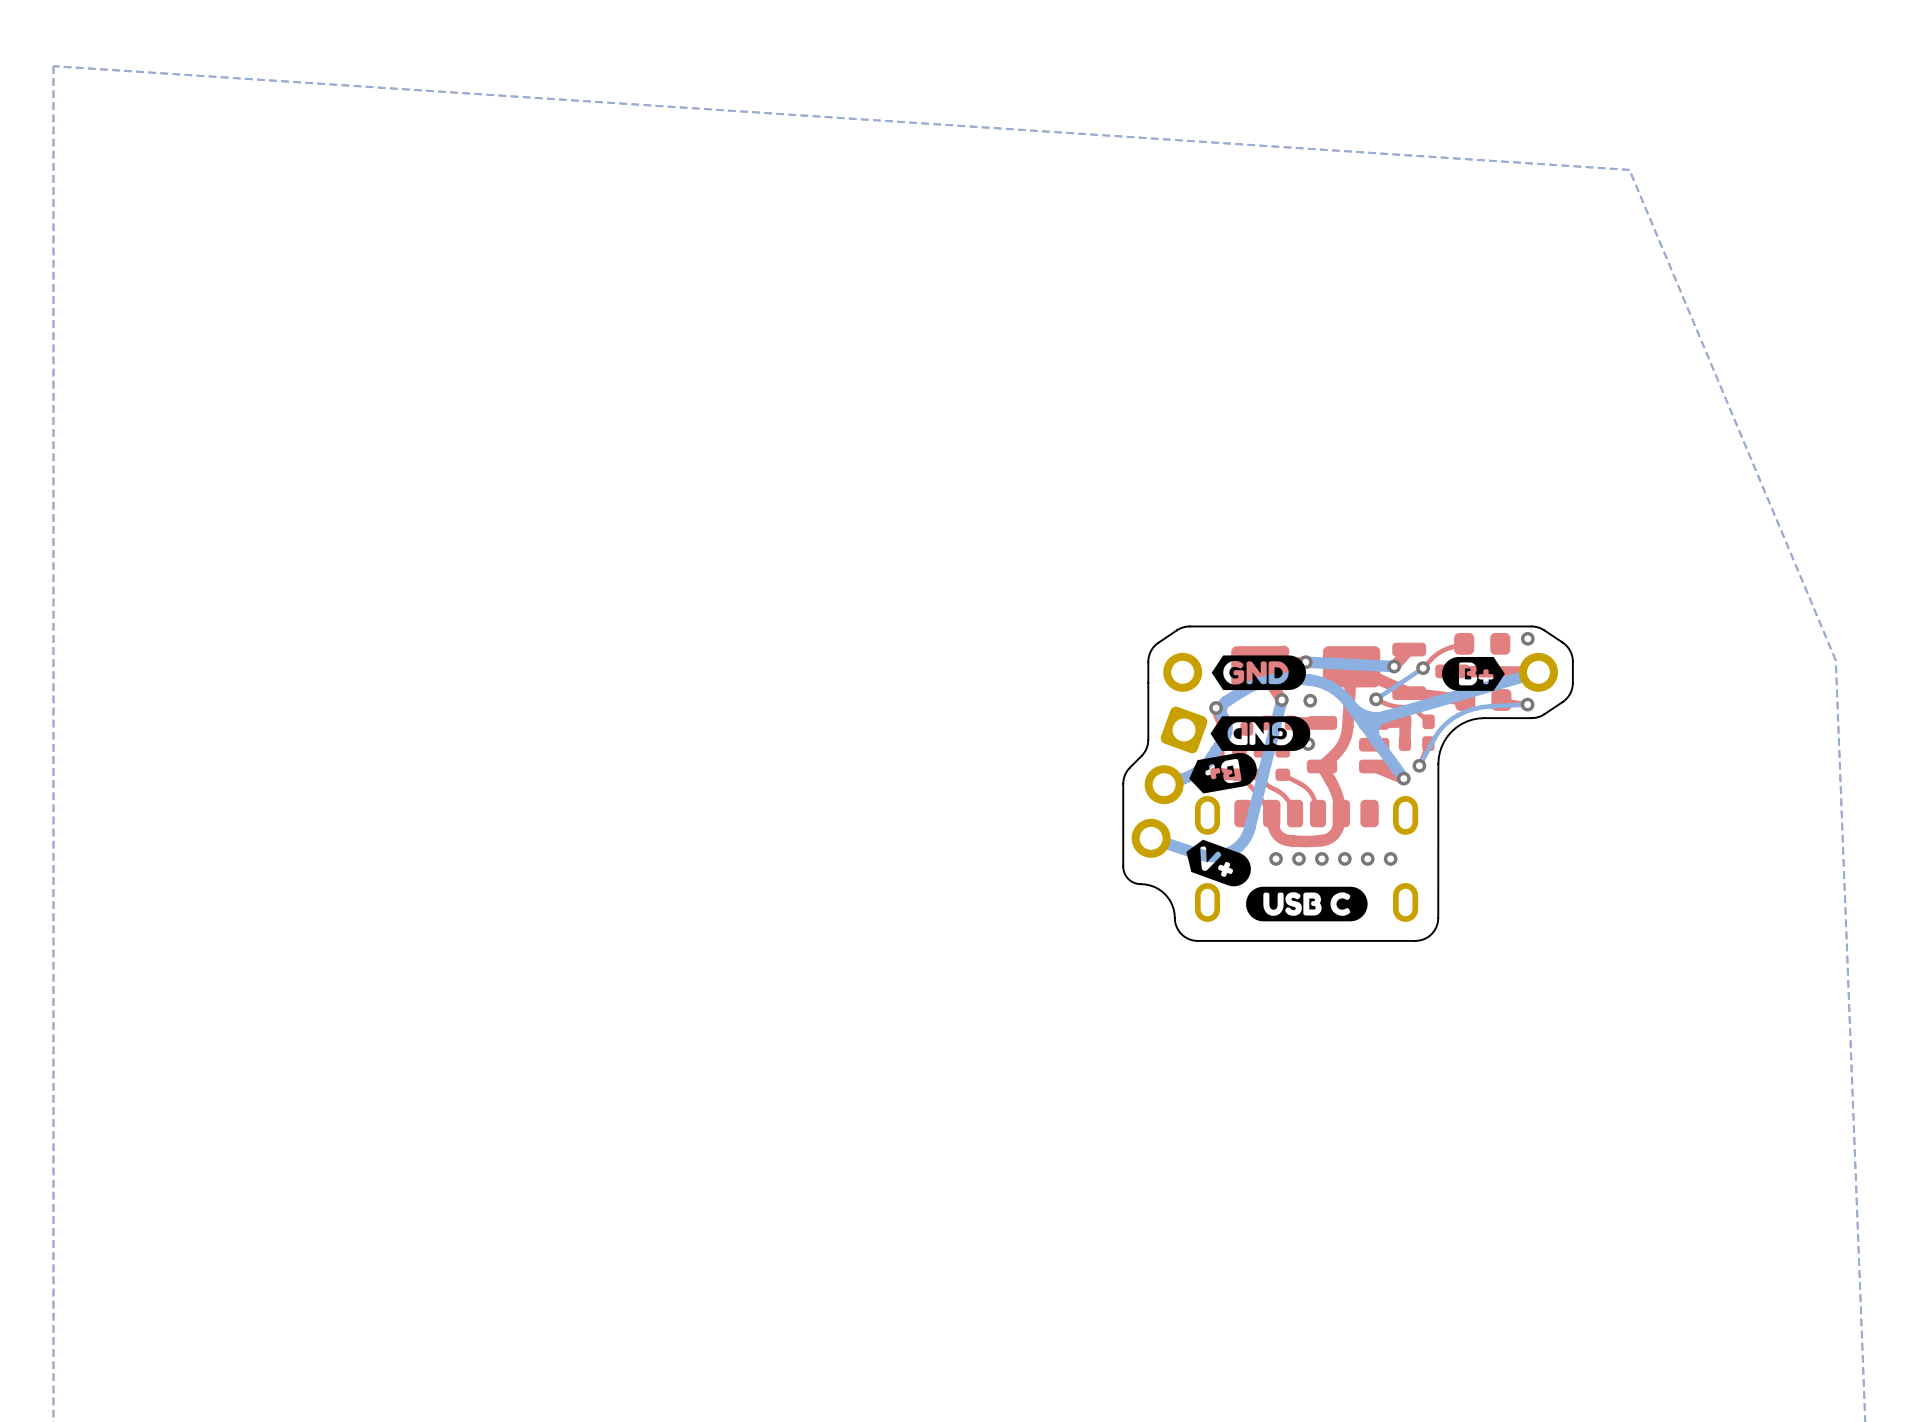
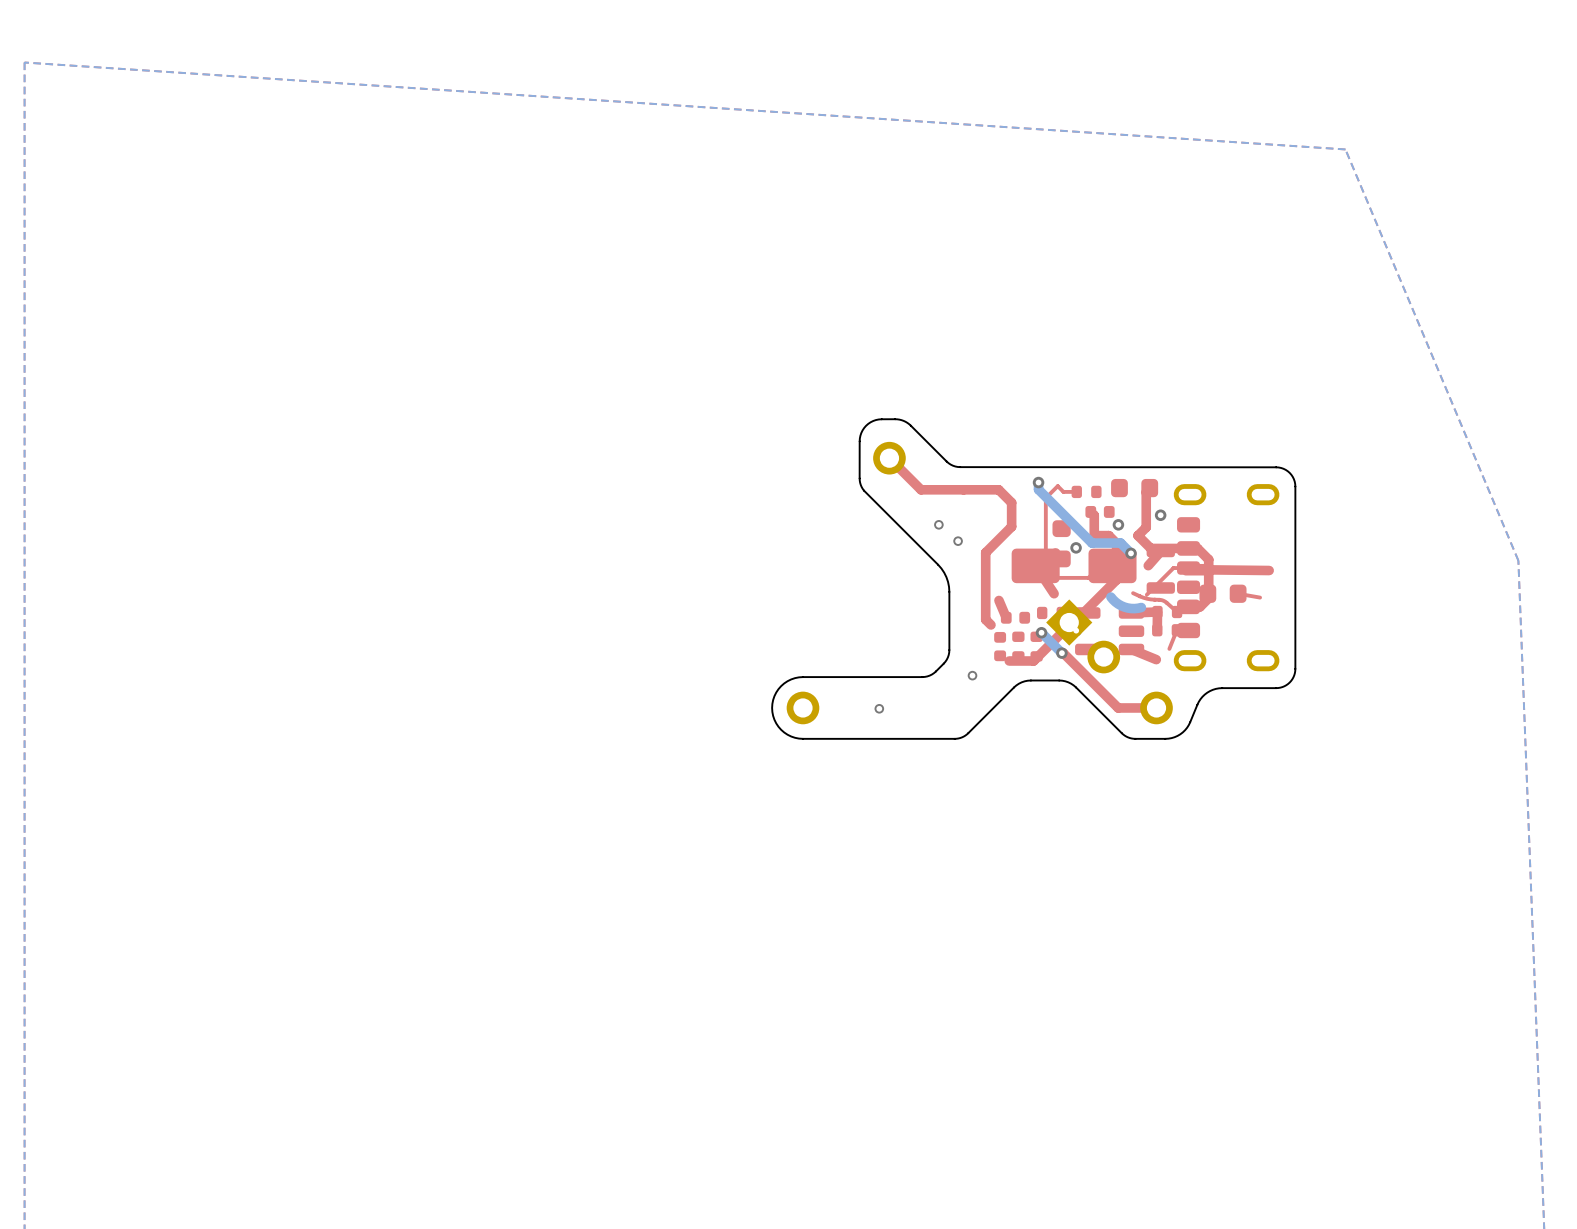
board edge: none -> (895, 419) (876, 420) (868, 423) (862, 430) (859, 441) (860, 482) (863, 490) (944, 572) (949, 591) (947, 657) (934, 673) (924, 676) (802, 677) (791, 679) (784, 683) (776, 692) (772, 707) (776, 723) (787, 734) (802, 738) (958, 738) (966, 734) (1018, 683) (1027, 680) (1059, 680) (1073, 685) (1126, 736) (1133, 738) (1168, 738) (1177, 735) (1185, 730) (1198, 701) (1210, 691) (1222, 688) (1278, 688) (1286, 685) (1292, 679) (1295, 668) (1295, 486) (1292, 476) (1285, 469) (1276, 467) (957, 466) (946, 461) (909, 424) (895, 419)
top track: none -> (889, 458) (921, 489) (998, 489) (1011, 502) (1011, 526) (985, 552) (985, 619) (990, 624)
part: none -> (889, 458)
bottom track: none -> (1038, 482) (1038, 489) (1091, 543) (1120, 543) (1131, 553)
via: none -> (1038, 482)
part: none -> (1134, 488)
top track: none -> (1149, 488) (1146, 492) (1146, 527) (1137, 535) (1150, 548) (1197, 548) (1208, 559) (1208, 598) (1200, 606) (1188, 606)
top track: none -> (1076, 491) (1063, 491) (1057, 486) (1045, 498) (1045, 568) (1055, 577) (1088, 577) (1094, 572)
top track: none -> (1090, 511) (1094, 515) (1094, 535) (1108, 535) (1116, 543) (1116, 579) (1073, 622) (1069, 622)
part: none -> (1100, 511)
via: none -> (1160, 515)
via: none -> (938, 524)
via: none -> (1118, 524)
board edge: (1531, 626) (1189, 626) (1176, 630) (1156, 644) (1148, 656) (1147, 744) (1143, 754) (1126, 772) (1123, 780) (1123, 866) (1125, 875) (1133, 882) (1152, 886) (1164, 894) (1172, 906) (1177, 929) (1183, 936) (1191, 940) (1415, 940) (1426, 937) (1435, 929) (1438, 921) (1438, 763) (1439, 752) (1444, 741) (1456, 727) (1472, 719) (1540, 716) (1564, 700) (1571, 691) (1572, 661) (1570, 650) (1564, 644) (1544, 630) (1531, 626) -> none
via: none -> (958, 541)
via: (1527, 638) -> none
part: none -> (1061, 543)
top track: (1464, 643) (1440, 652) (1423, 668) -> none
part: (1482, 643) -> none
via: none -> (1131, 553)
drawing: [1189, 655, 1311, 794] -> none
drawing: [1442, 656, 1505, 691] -> none
bottom track: (1305, 662) (1394, 666) -> none
via position: (1305, 662) -> (1076, 547)
via: (1394, 666) -> none
bottom track: (1423, 668) (1376, 699) -> none
via: (1423, 668) -> none
top track: none -> (1188, 568) (1173, 568) (1146, 594)
part: (1182, 672) -> none
bottom track: (1538, 672) (1382, 717) (1374, 726) (1373, 733) (1376, 740) -> none
part: (1538, 672) -> none
via: (1376, 699) -> none
bottom track: (1281, 700) (1249, 828) (1240, 845) (1226, 853) (1207, 856) (1151, 838) -> none
via: (1281, 700) -> none
via: (1310, 700) -> none
top track: (1465, 700) (1409, 693) (1351, 666) (1345, 737) (1338, 751) (1322, 766) (1335, 790) (1341, 813) (1335, 832) (1324, 840) (1299, 841) (1281, 838) (1274, 829) (1271, 813) (1239, 774) (1217, 774) -> none
bottom track: (1527, 704) (1482, 707) (1458, 715) (1440, 729) (1419, 765) -> none
via: (1527, 704) -> none
via: (1216, 708) -> none
top track: none -> (1079, 616) (1033, 660) (1009, 660)
bottom track: none -> (1041, 632) (1061, 653)
via: none -> (1041, 632)
part: none -> (1083, 636)
part: (1176, 755) -> none
part rotation: 0° (1282, 763) -> 90° clockwise (1086, 491)
part position: (1282, 763) -> (1086, 491)
via: (1419, 765) -> none
top track: none -> (1061, 653) (1118, 707) (1156, 707)
via: none -> (1061, 653)
top track: (1261, 774) (1266, 784) (1286, 798) (1295, 813) -> none
top track: (1282, 774) (1307, 789) (1313, 798) (1317, 813) -> none
bottom track: (1403, 778) (1340, 694) (1320, 682) (1287, 678) (1258, 683) (1225, 702) (1221, 711) (1226, 725) (1226, 734) (1208, 761) (1194, 773) (1164, 784) -> none
via: (1403, 778) -> none
via: none -> (972, 675)
part: none -> (802, 707)
part: none -> (1156, 707)
via: none -> (879, 708)
part: (1151, 838) -> none
drawing: [1186, 839, 1368, 922] -> none
via: (1276, 858) -> none
via: (1298, 858) -> none
part rotation: 0° (1306, 858) -> 90° counterclockwise (1226, 577)
part position: (1306, 858) -> (1226, 577)
via: (1321, 858) -> none
via: (1344, 858) -> none
via: (1367, 858) -> none
via: (1390, 858) -> none

